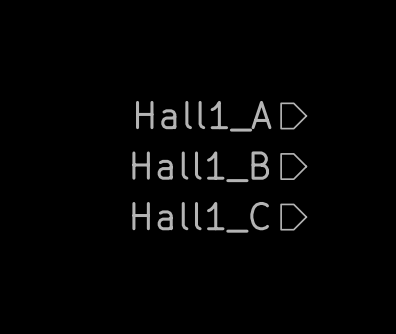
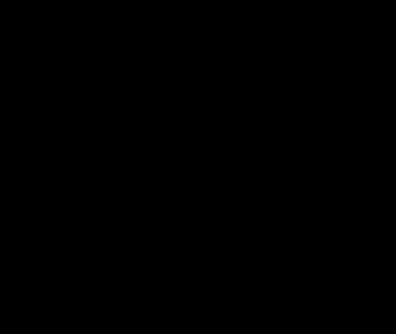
hierarchical label: Hall1_A (203, 116) -> none
hierarchical label: Hall1_B (200, 166) -> none
hierarchical label: Hall1_C (200, 217) -> none

